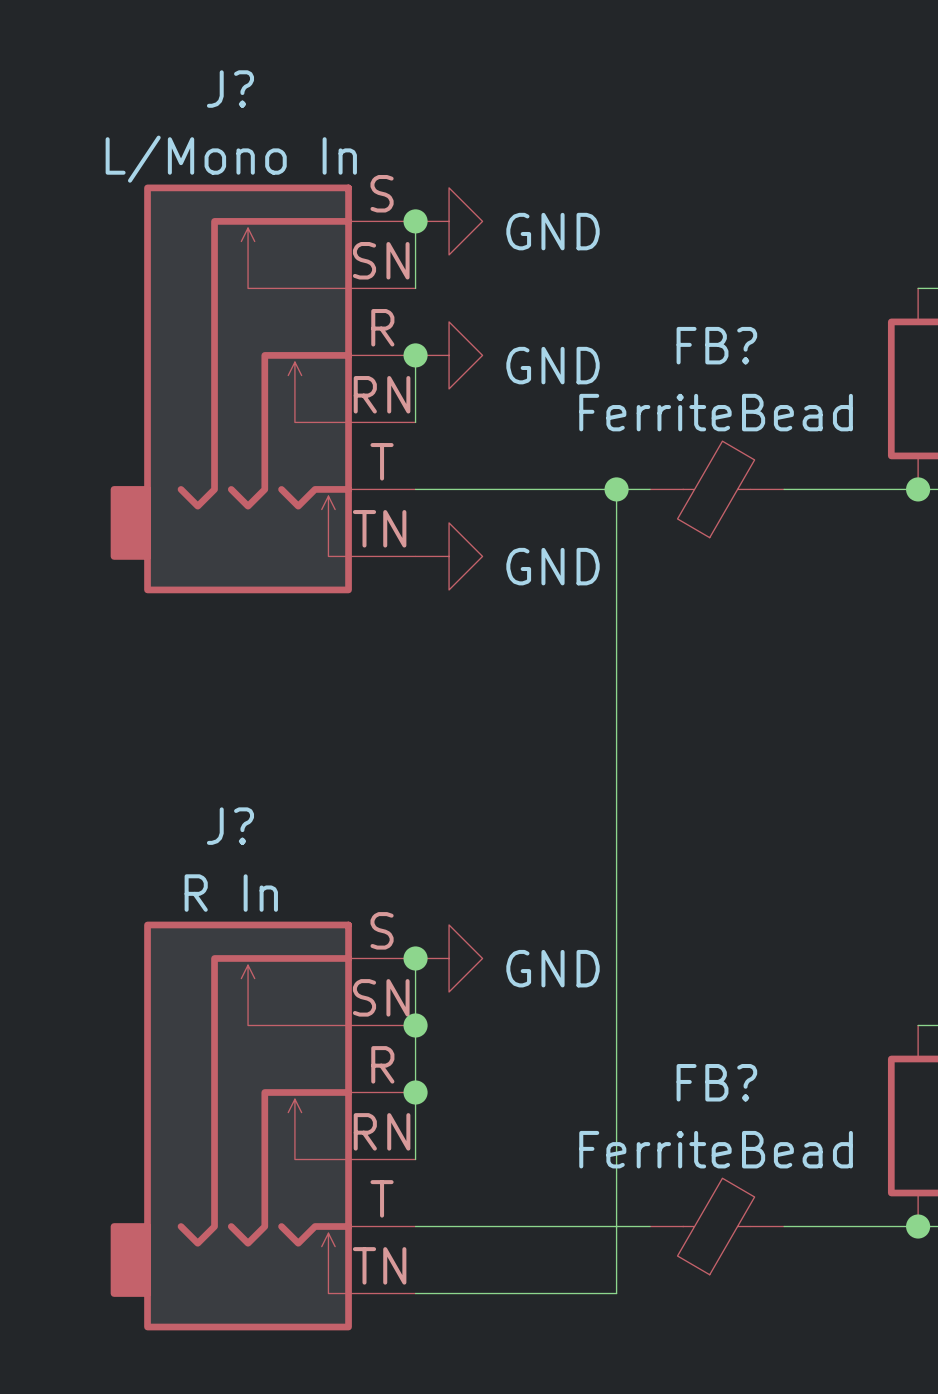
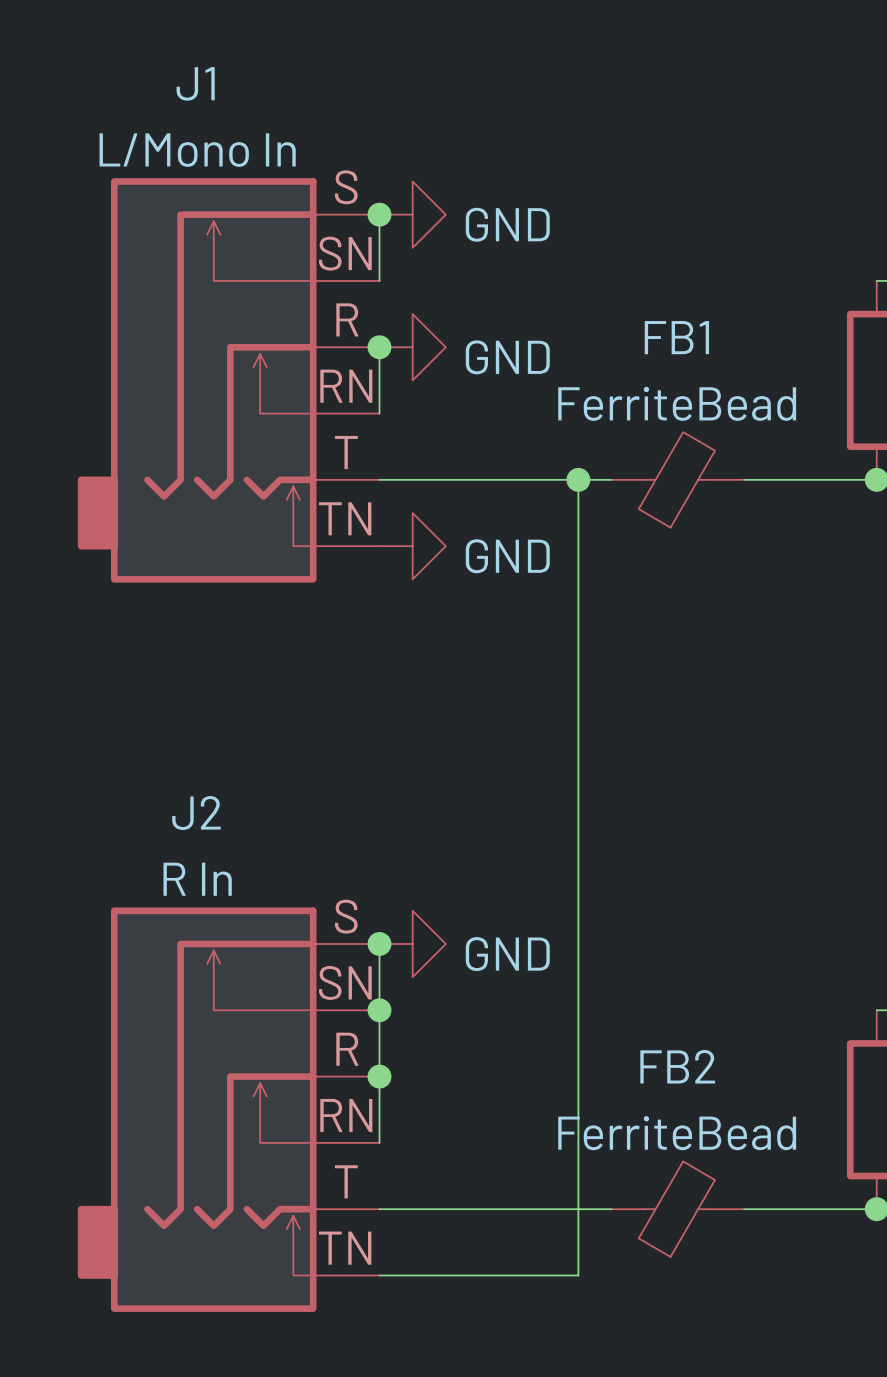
J? name: J? (230, 89) -> J1 (195, 83)
FB? name: FB? (716, 345) -> FB1 (676, 337)
J? name: J? (230, 826) -> J2 (196, 813)
FB? name: FB? (716, 1082) -> FB2 (677, 1066)

